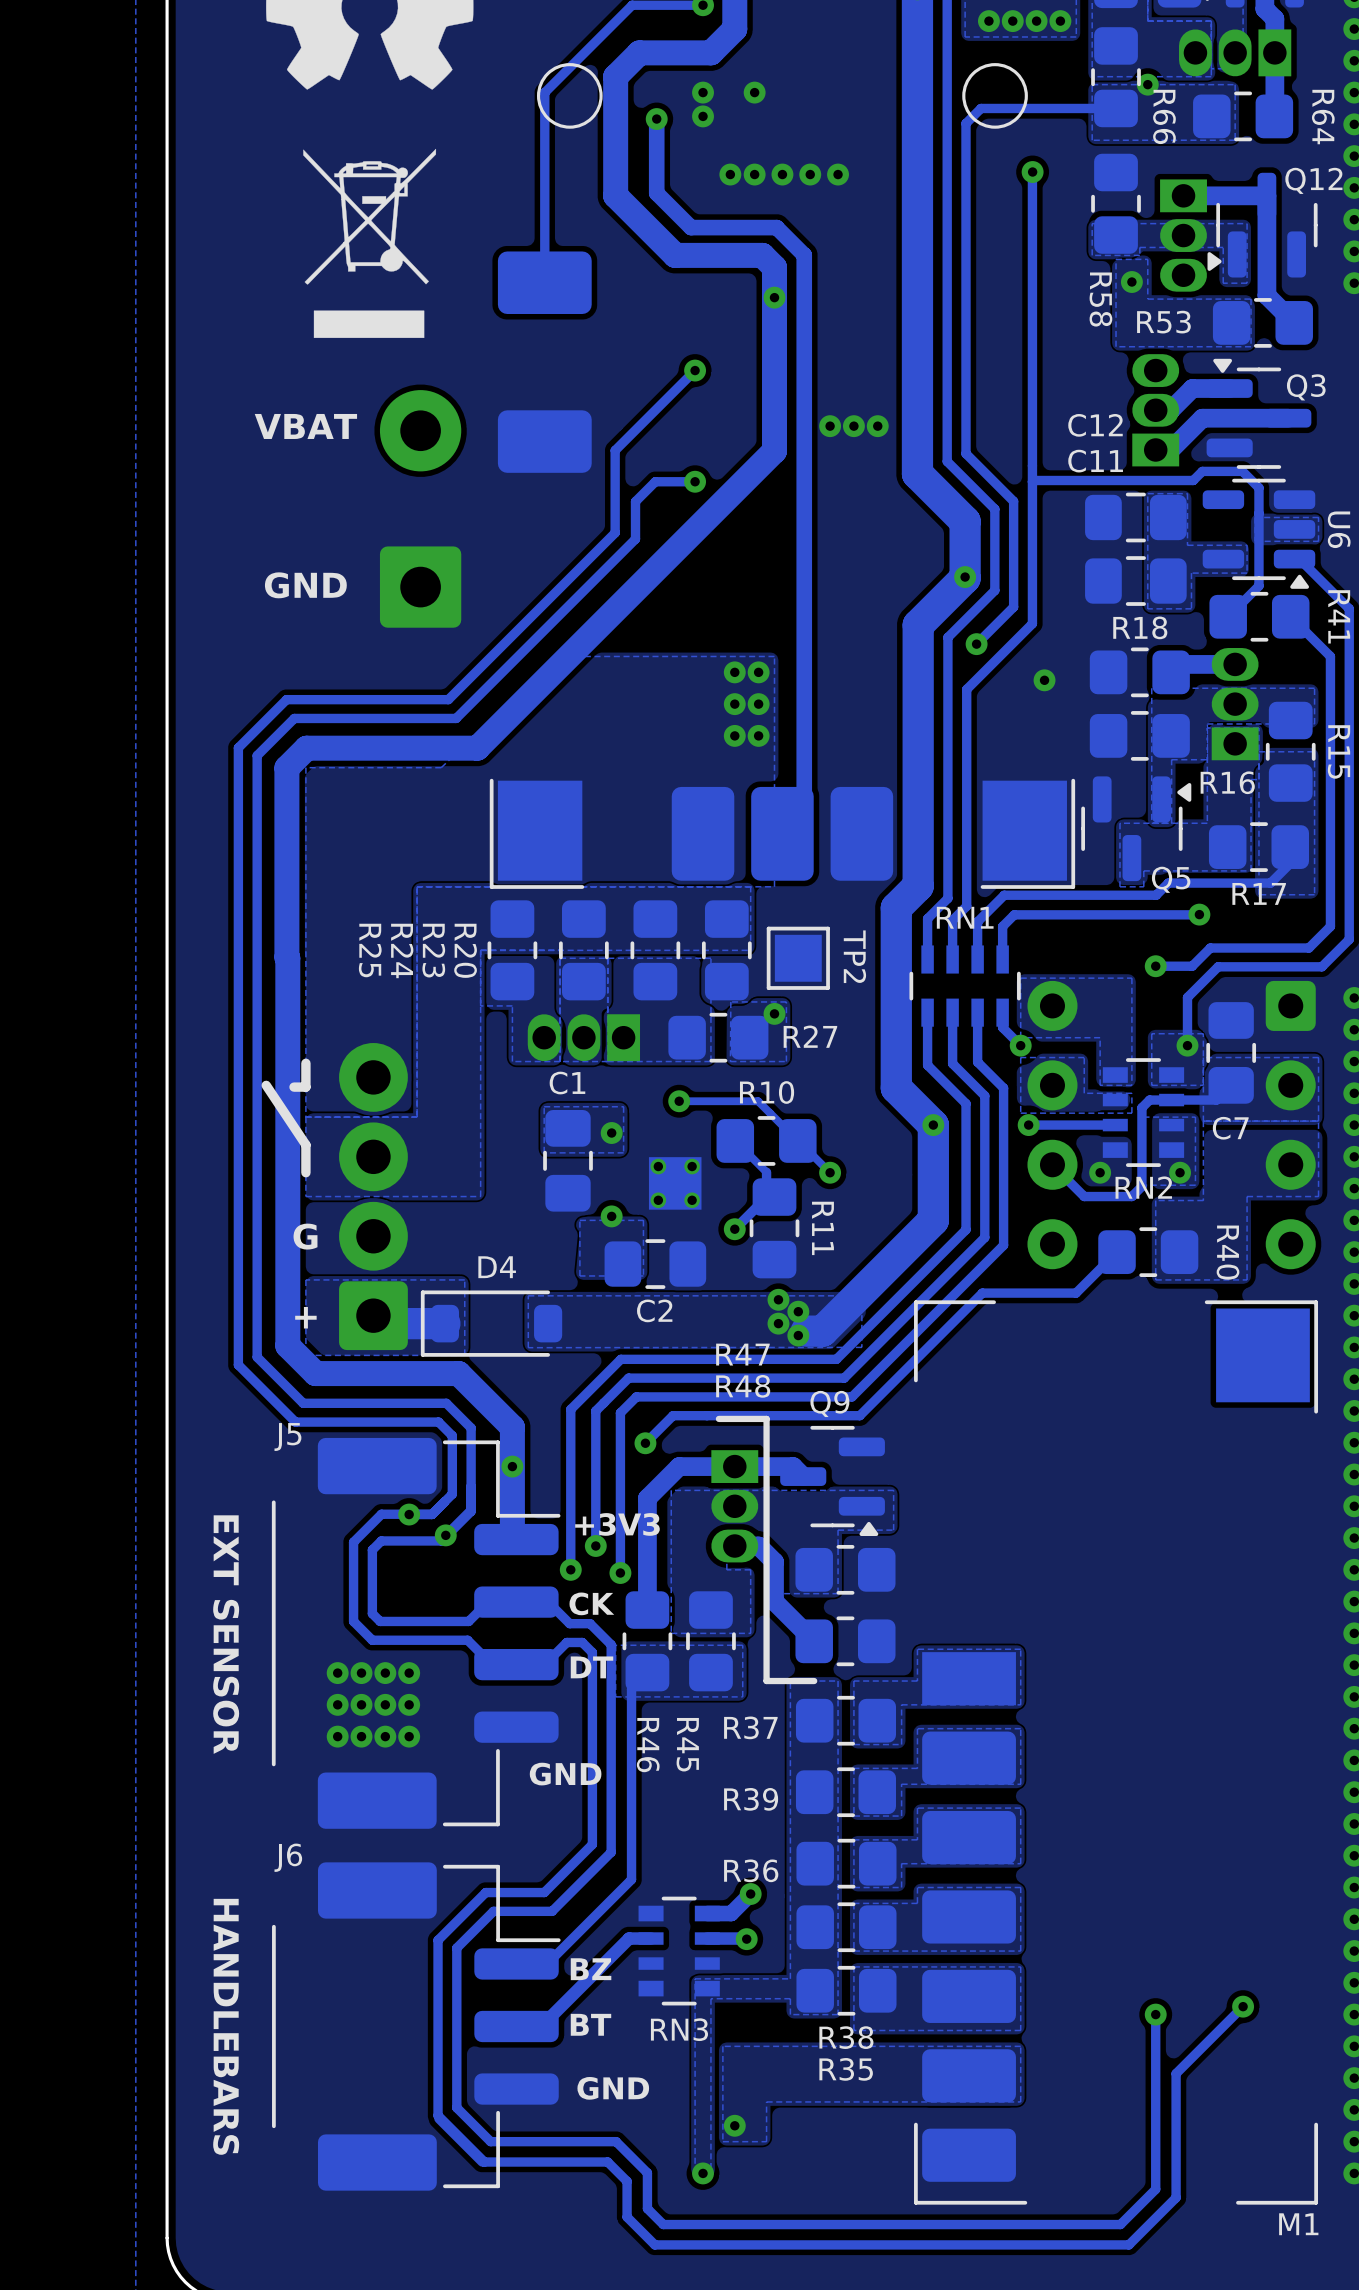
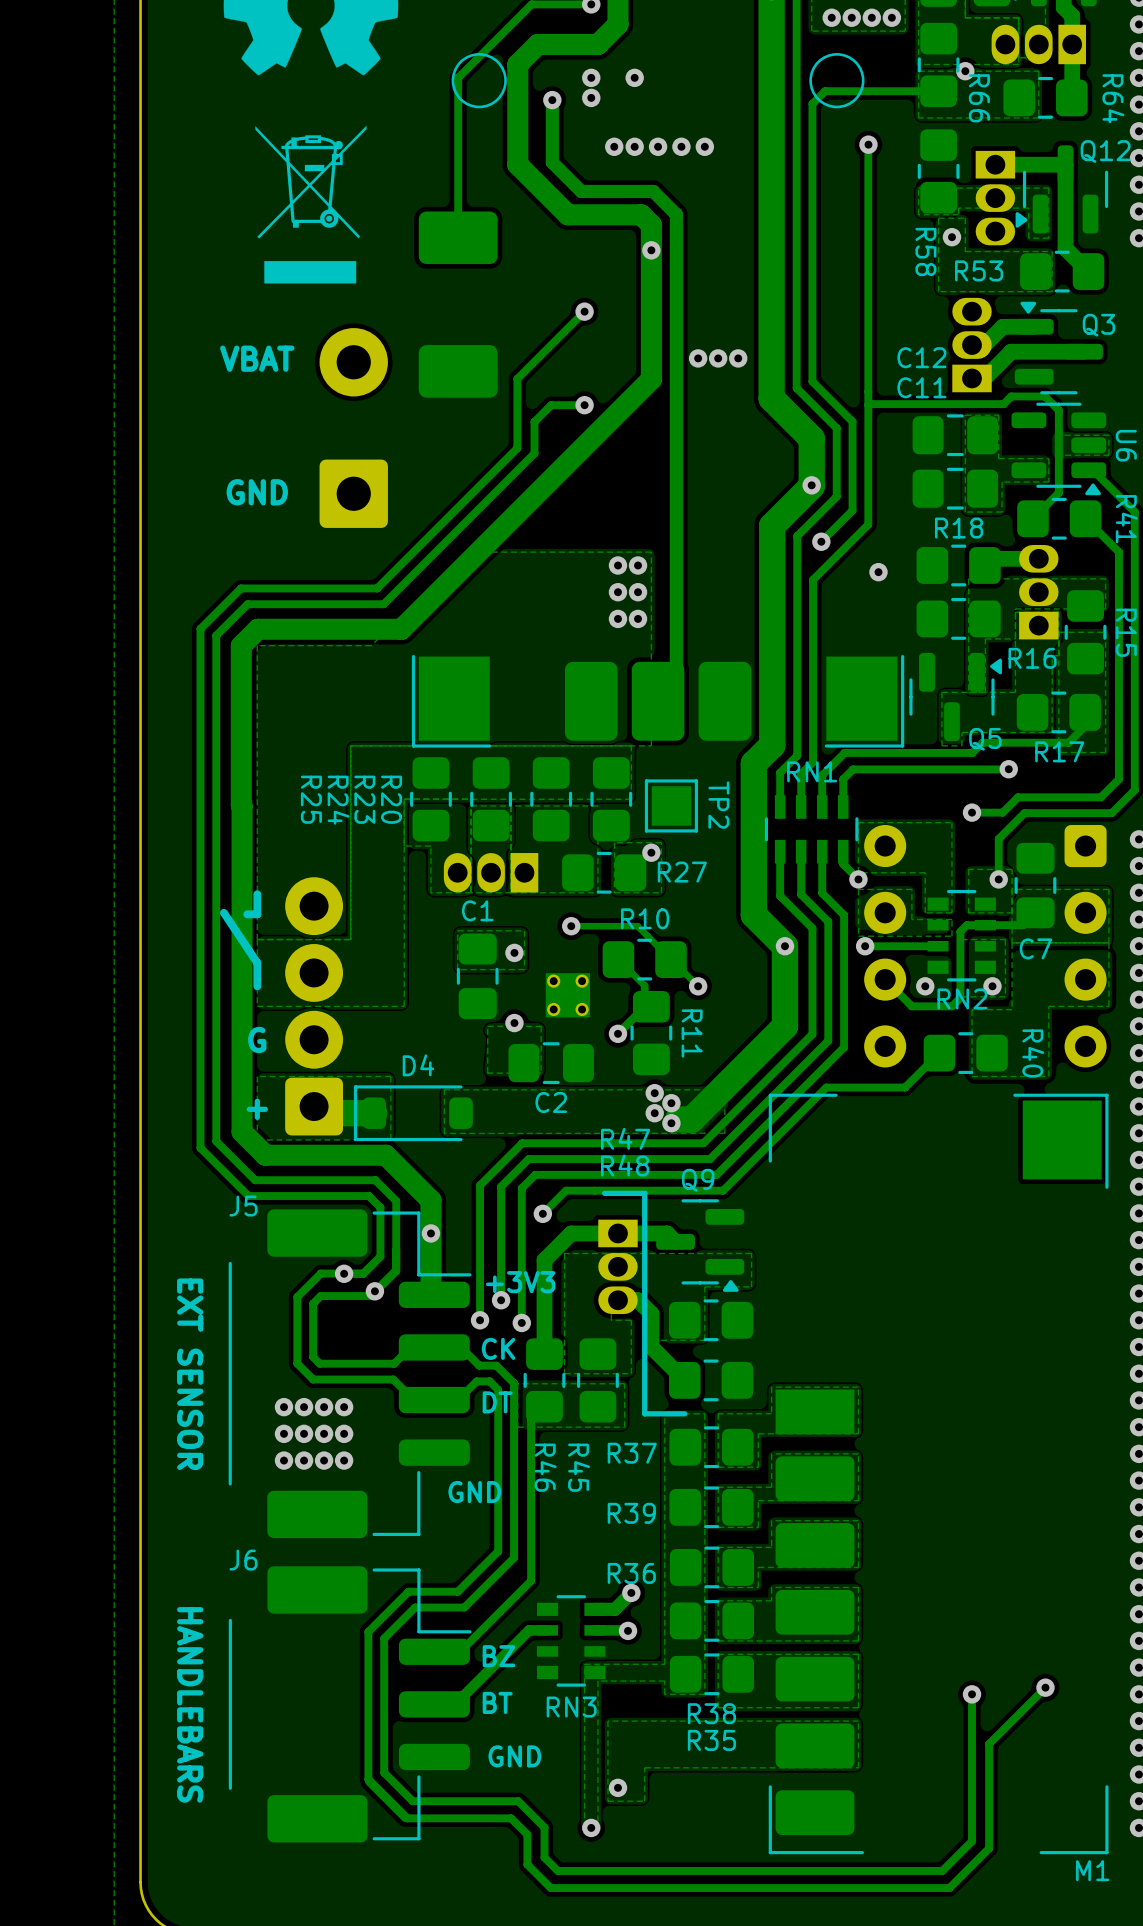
drawing shape: [303, 148, 437, 339] -> [255, 125, 367, 284]

